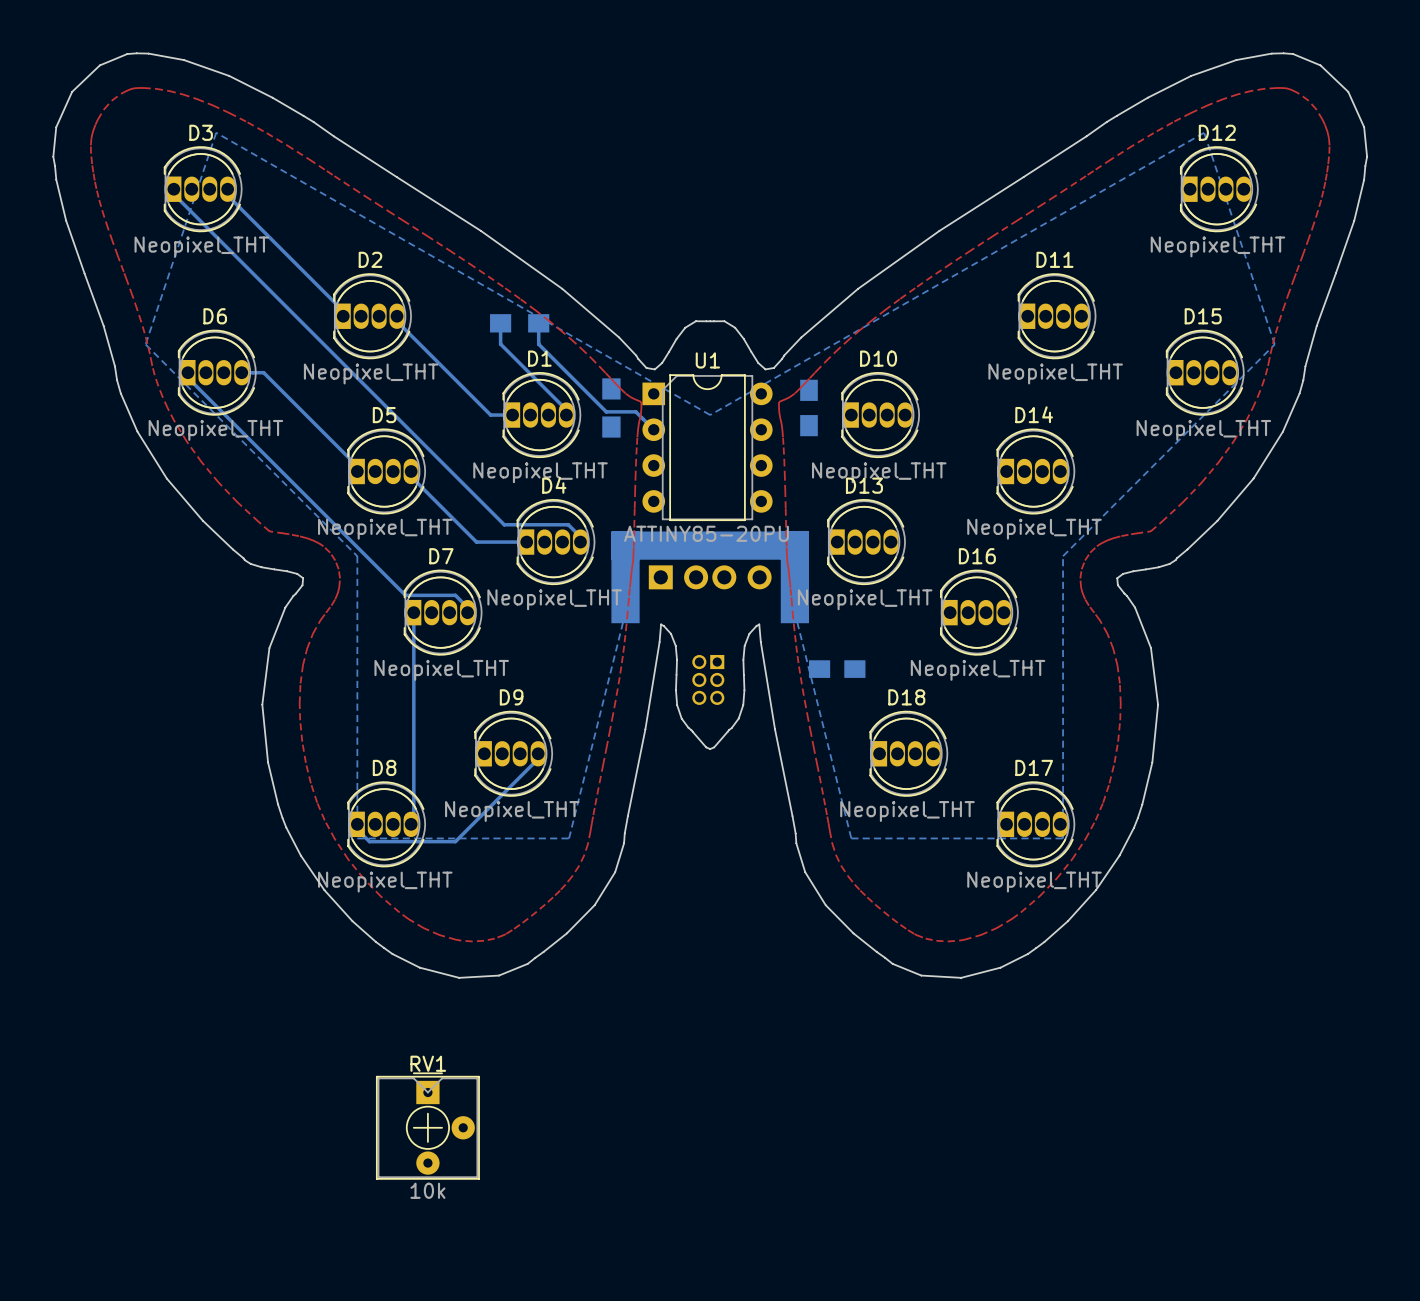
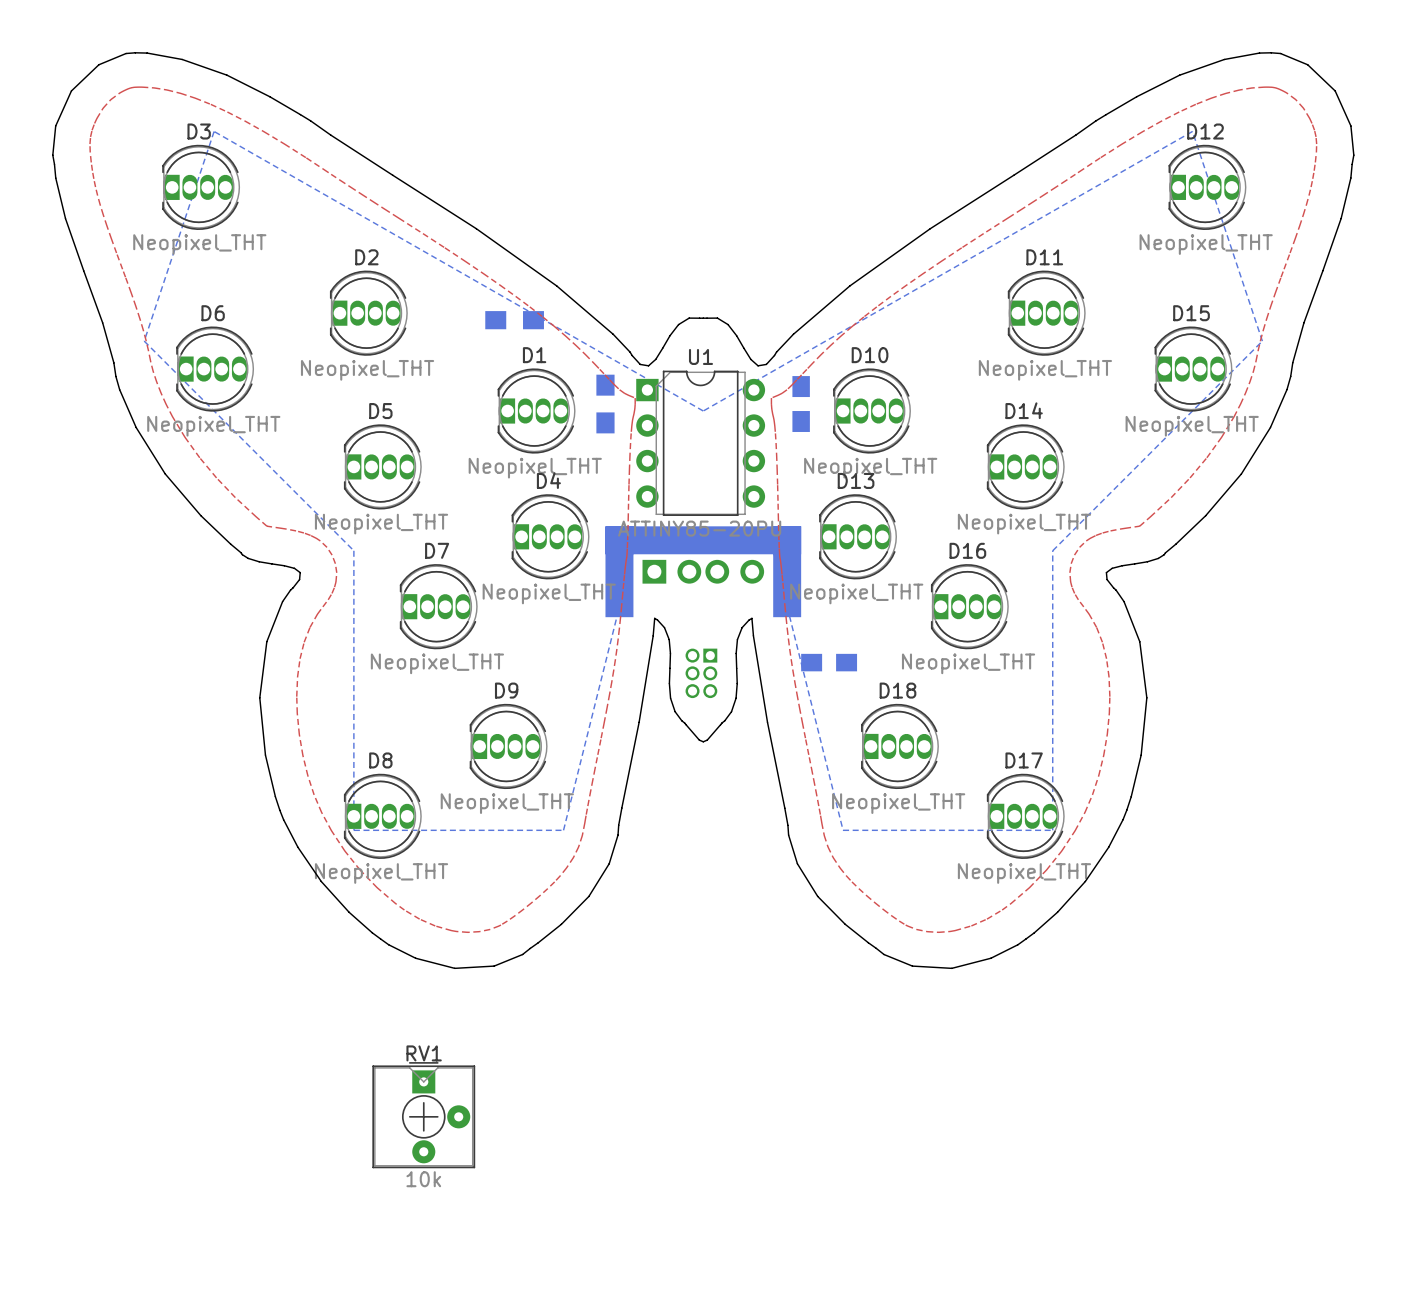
bottom track: (173, 189) (173, 194) (504, 524) (568, 524) (580, 536) (580, 542) -> none
bottom track: (227, 189) (227, 195) (343, 311) (343, 316) -> none
bottom track: (397, 316) (397, 321) (490, 415) (512, 415) -> none
bottom track: (500, 323) (500, 344) (566, 409) (566, 415) -> none
bottom track: (538, 323) (538, 344) (606, 411) (635, 411) (653, 429) -> none
bottom track: (187, 372) (187, 377) (405, 595) (455, 595) (467, 607) (467, 612) -> none
bottom track: (241, 372) (263, 372) (357, 466) (357, 471) -> none
bottom track: (411, 471) (411, 476) (476, 542) (526, 542) -> none
bottom track: (413, 612) (413, 821) (411, 824) -> none
bottom track: (538, 753) (538, 758) (455, 841) (369, 841) (357, 829) (357, 824) -> none

